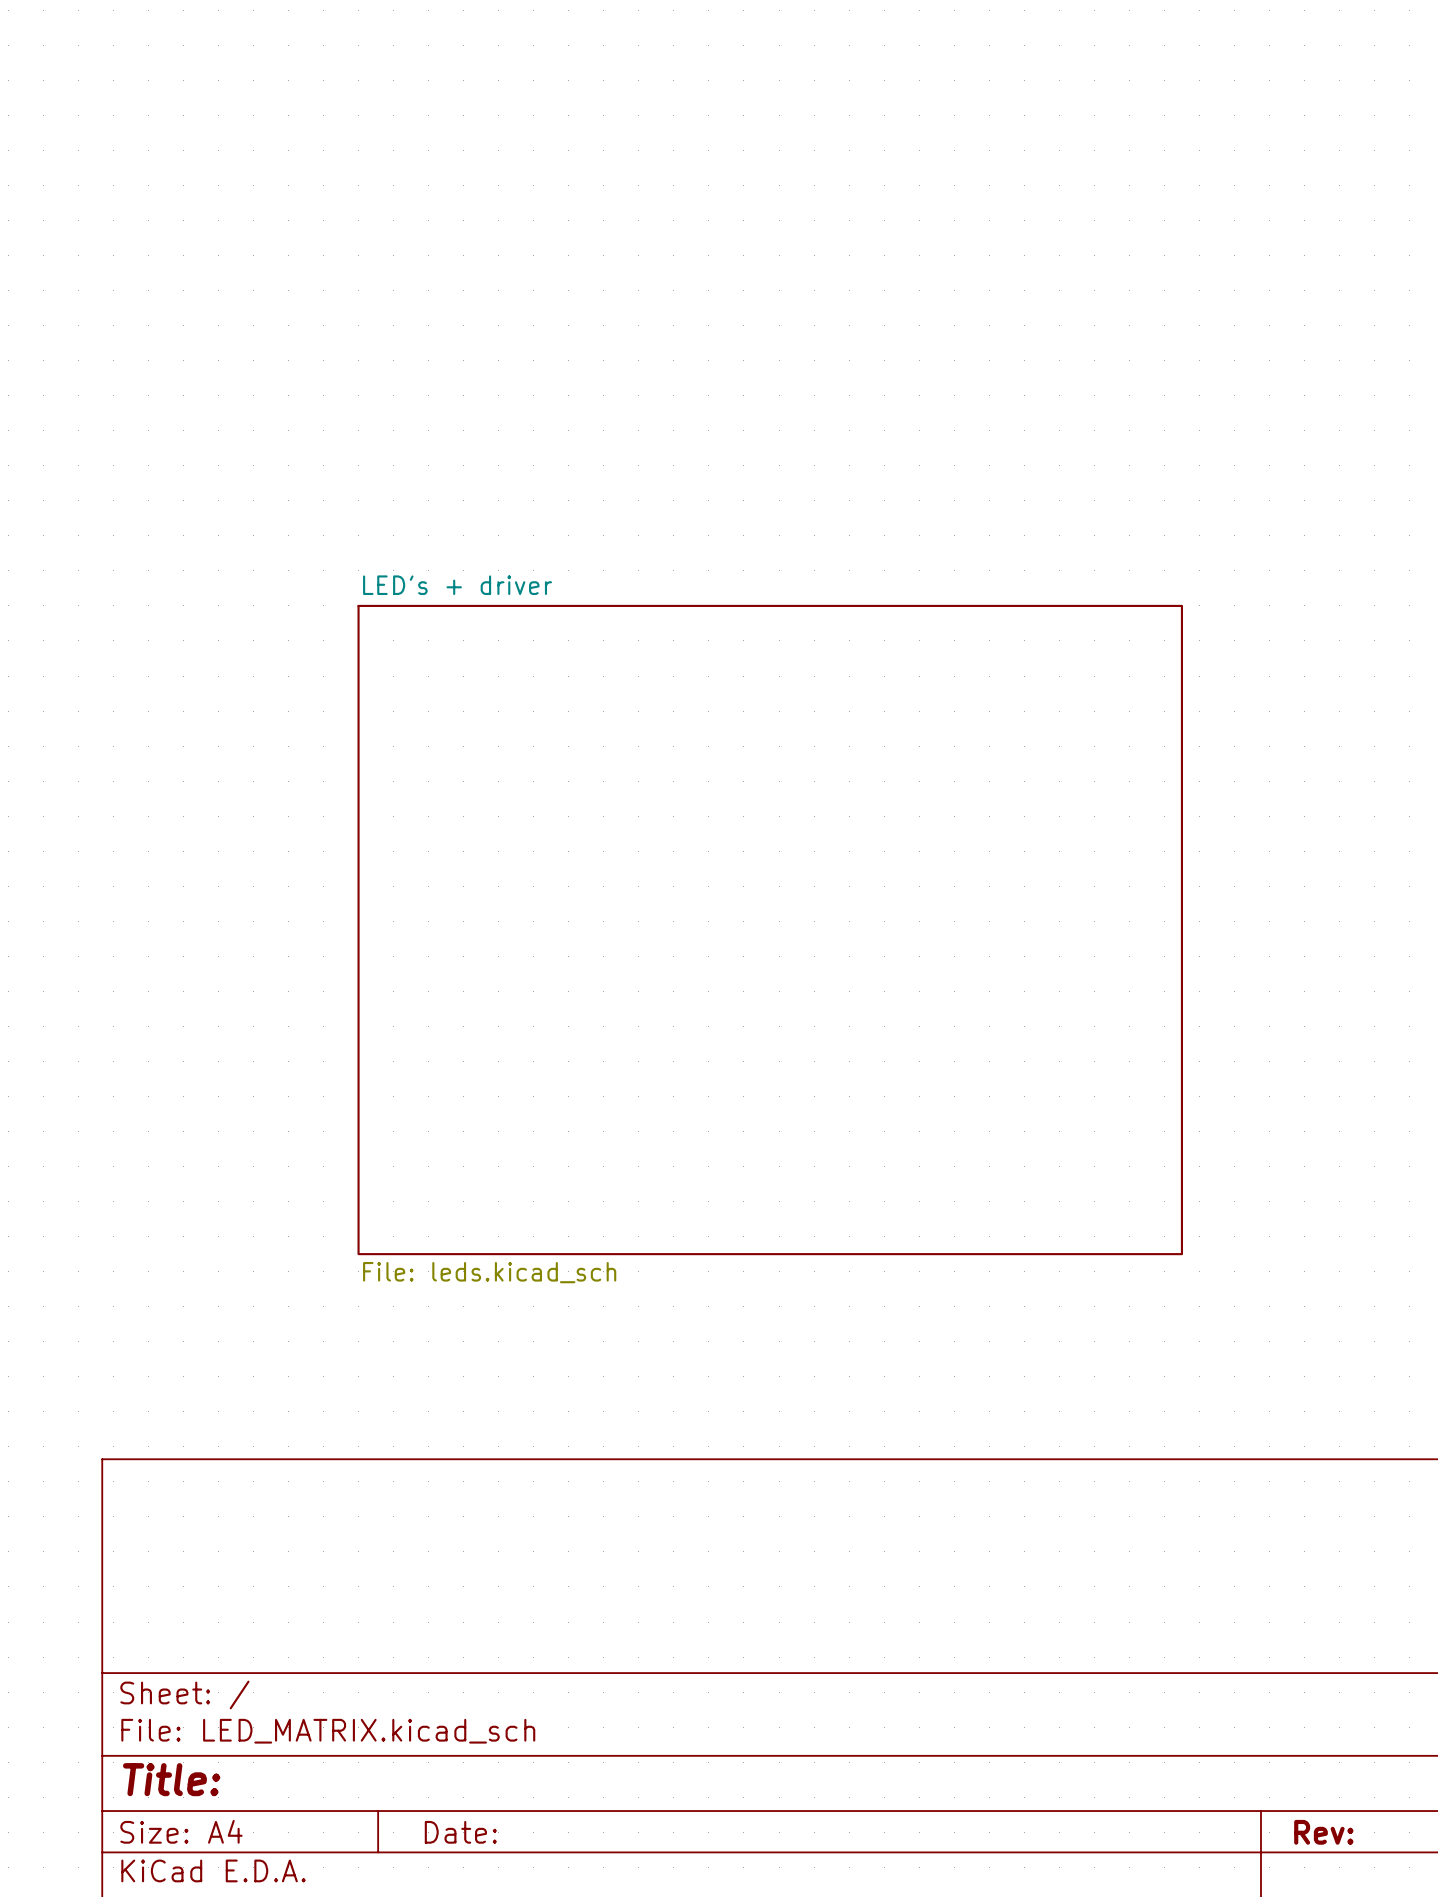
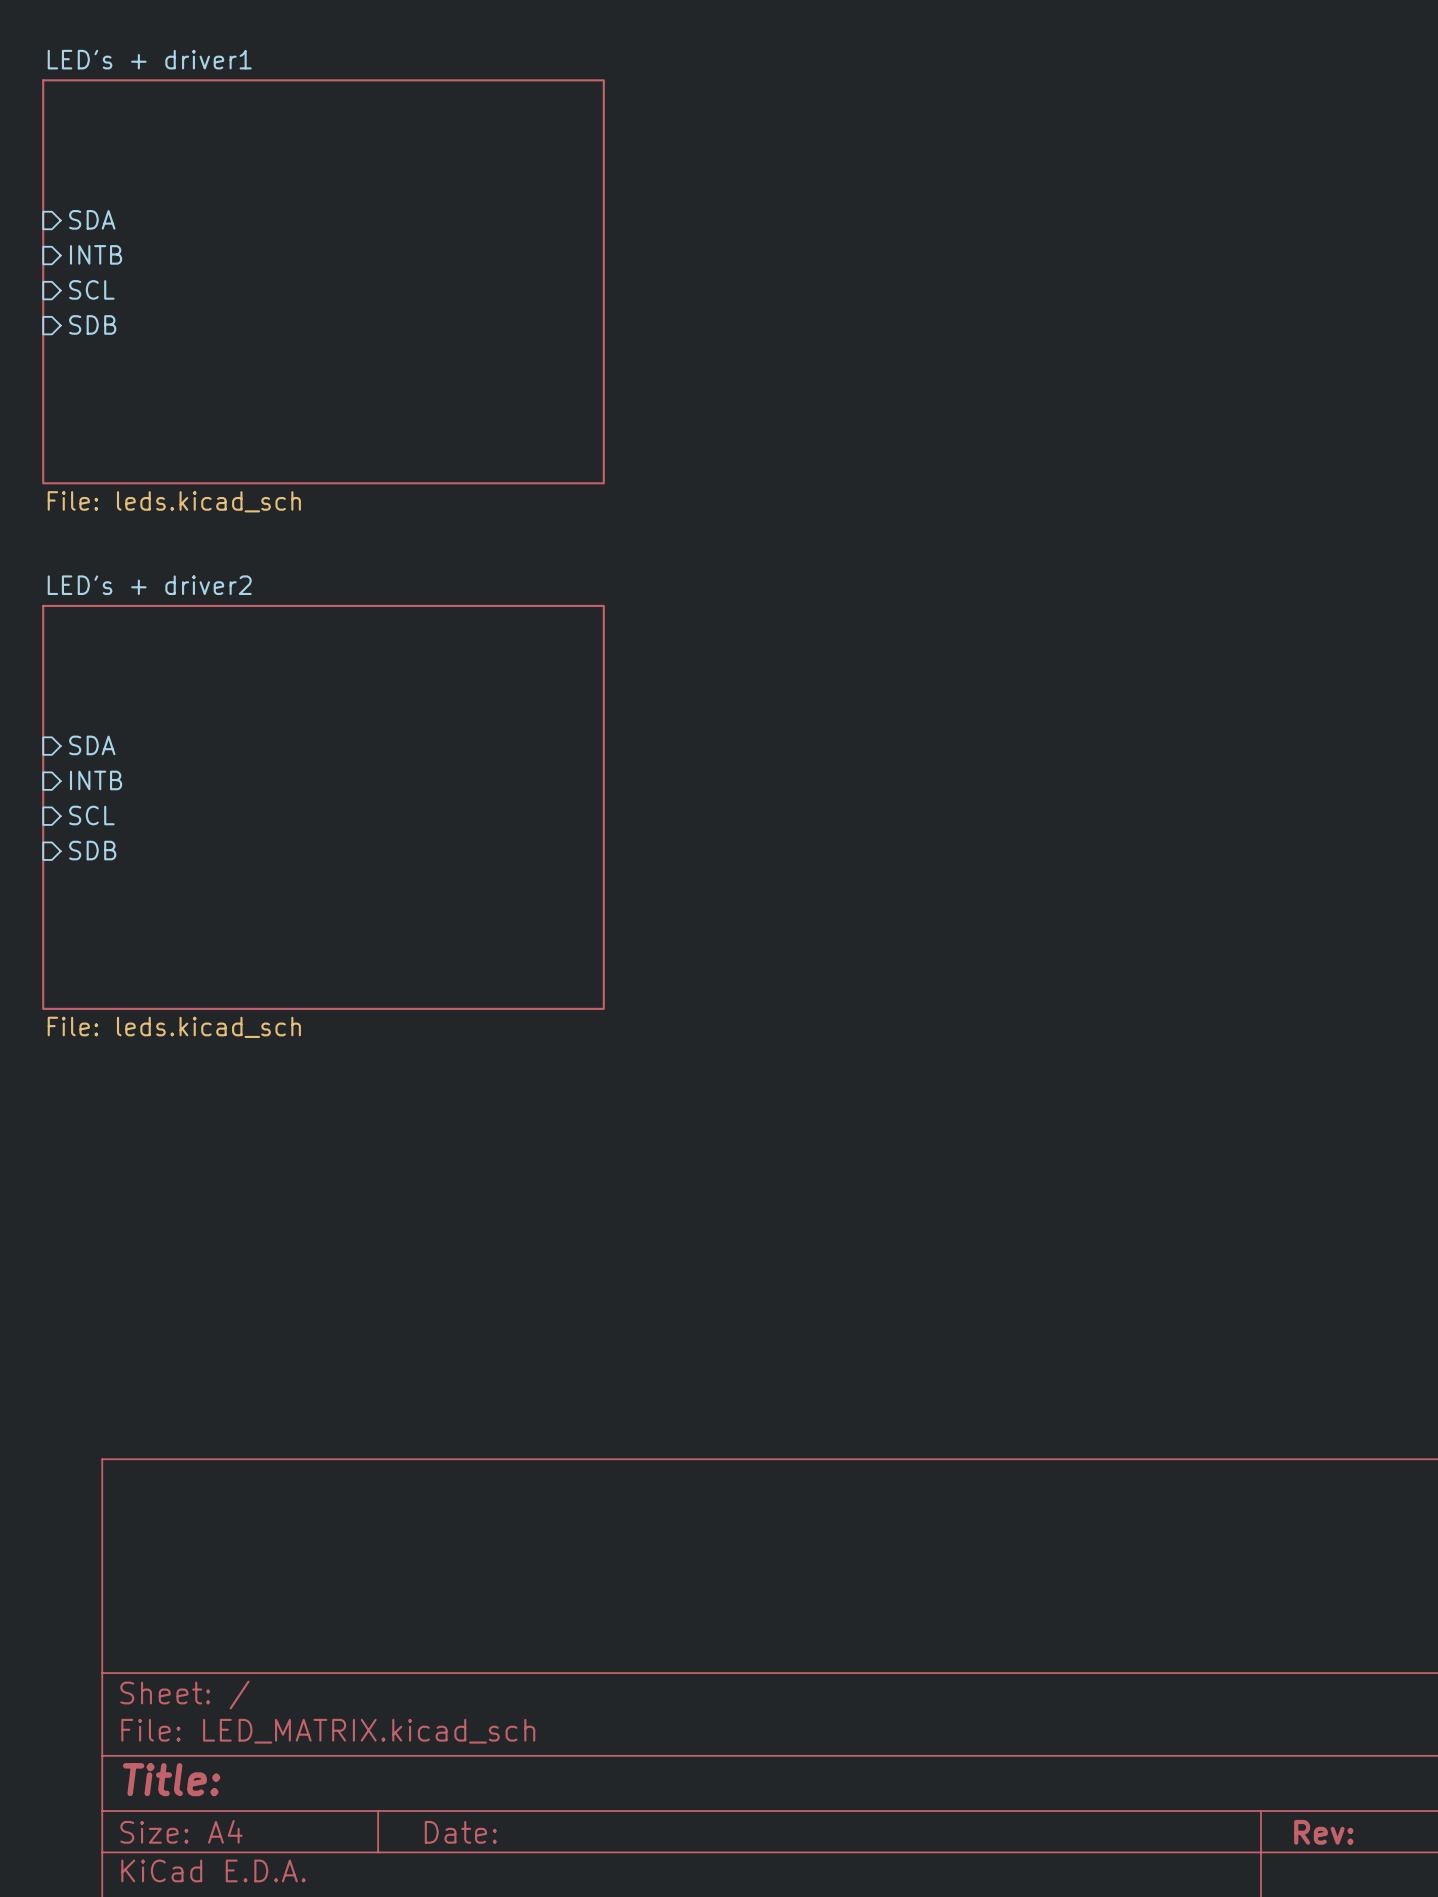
sheet pin: none -> SDA (92, 219)
sheet pin: none -> INTB (96, 254)
sheet LED's + driver1: none -> File: leds.kicad_sch (323, 281)
sheet pin: none -> SCL (91, 289)
sheet pin: none -> SDB (92, 324)
sheet pin: none -> SDA (92, 745)
sheet pin: none -> INTB (96, 780)
sheet LED's + driver2: none -> File: leds.kicad_sch (323, 807)
sheet pin: none -> SCL (91, 815)
sheet pin: none -> SDB (92, 850)
sheet LED's + driver: File: leds.kicad_sch (770, 930) -> none

